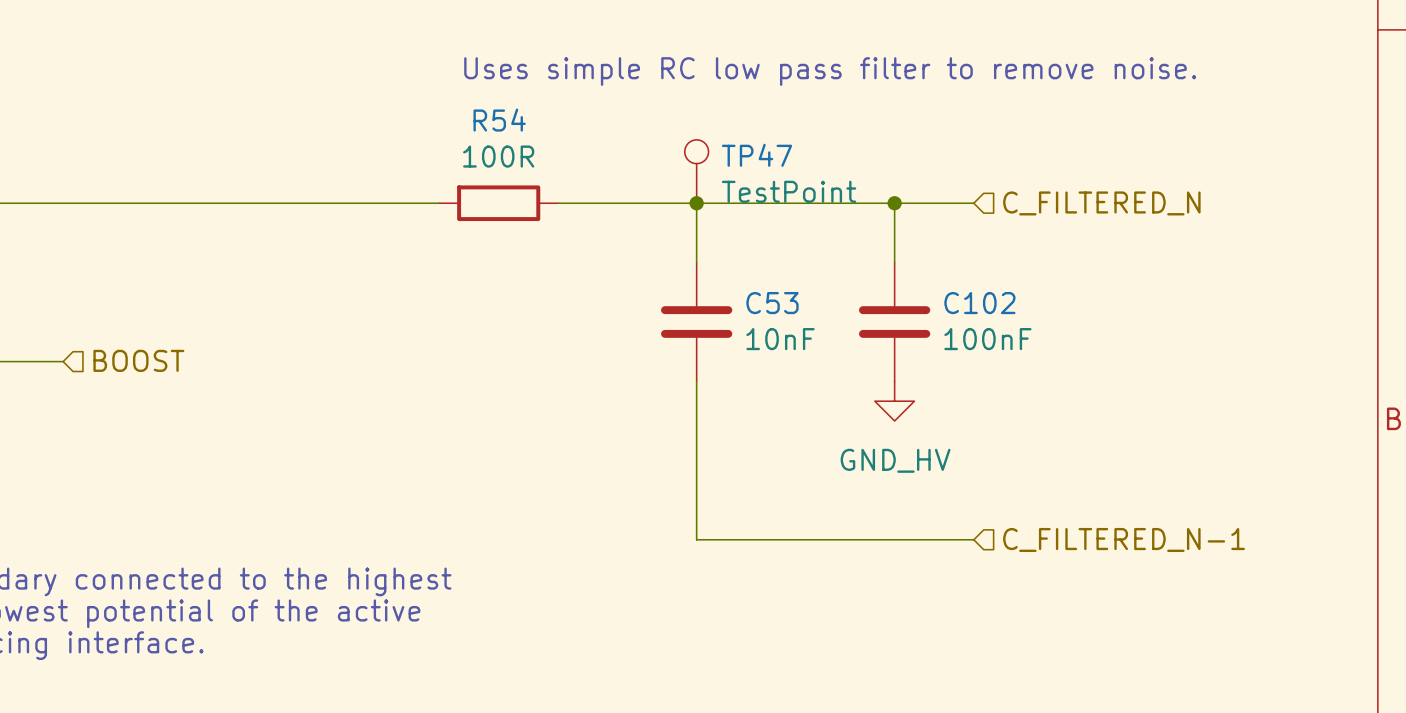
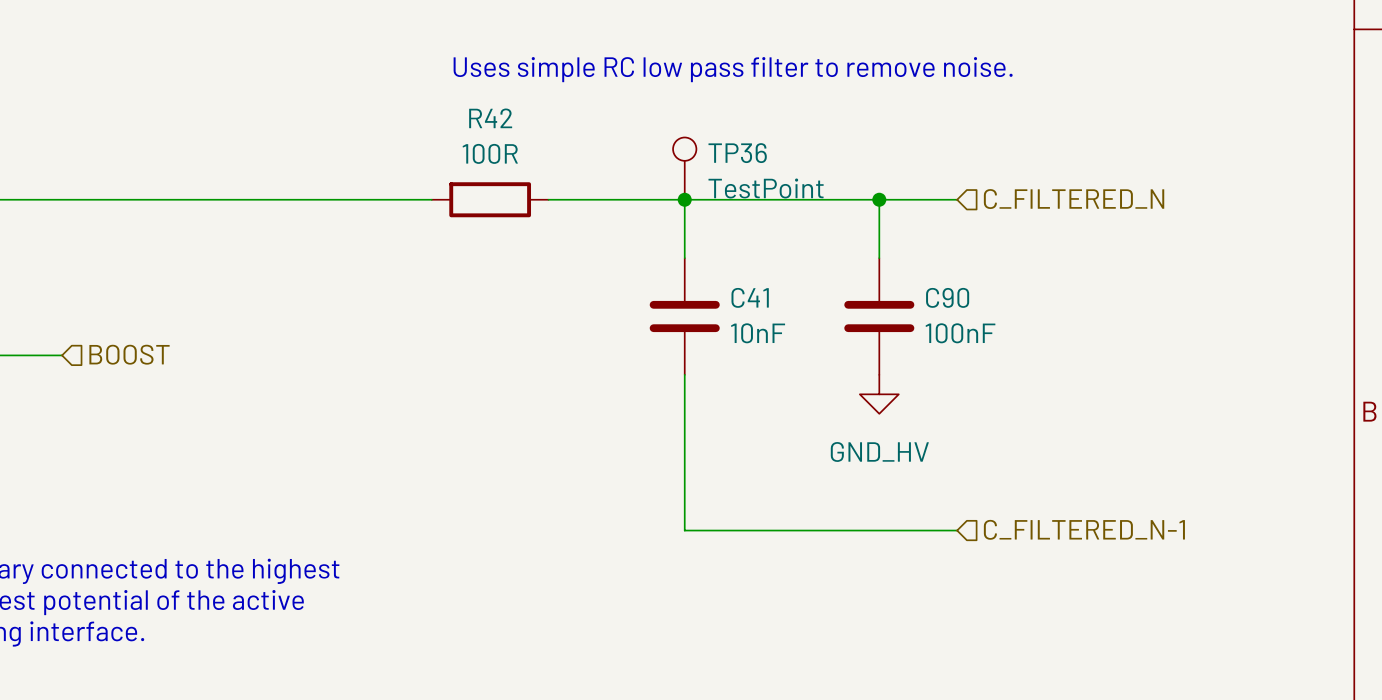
R54 name: R54 (499, 120) -> R42 (490, 118)
TP47 name: TP47 (757, 155) -> TP36 (737, 153)
C53 name: C53 (772, 303) -> C41 (750, 297)
C102 name: C102 (979, 303) -> C90 (947, 297)

